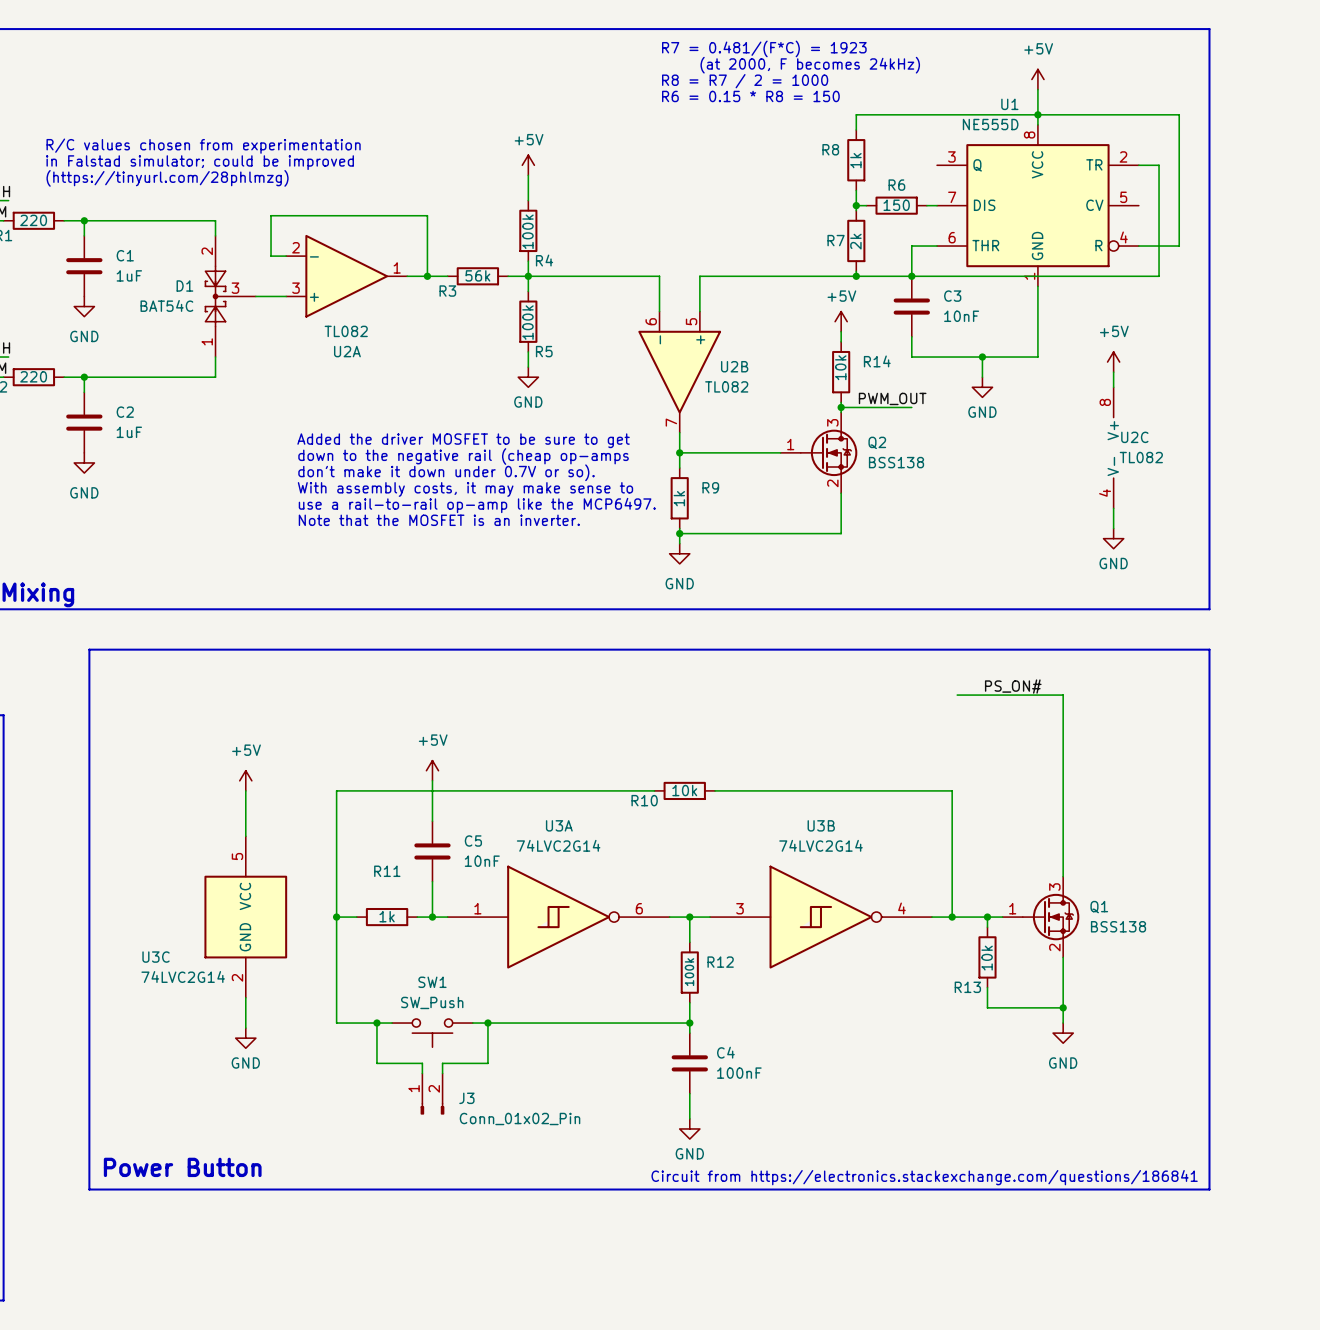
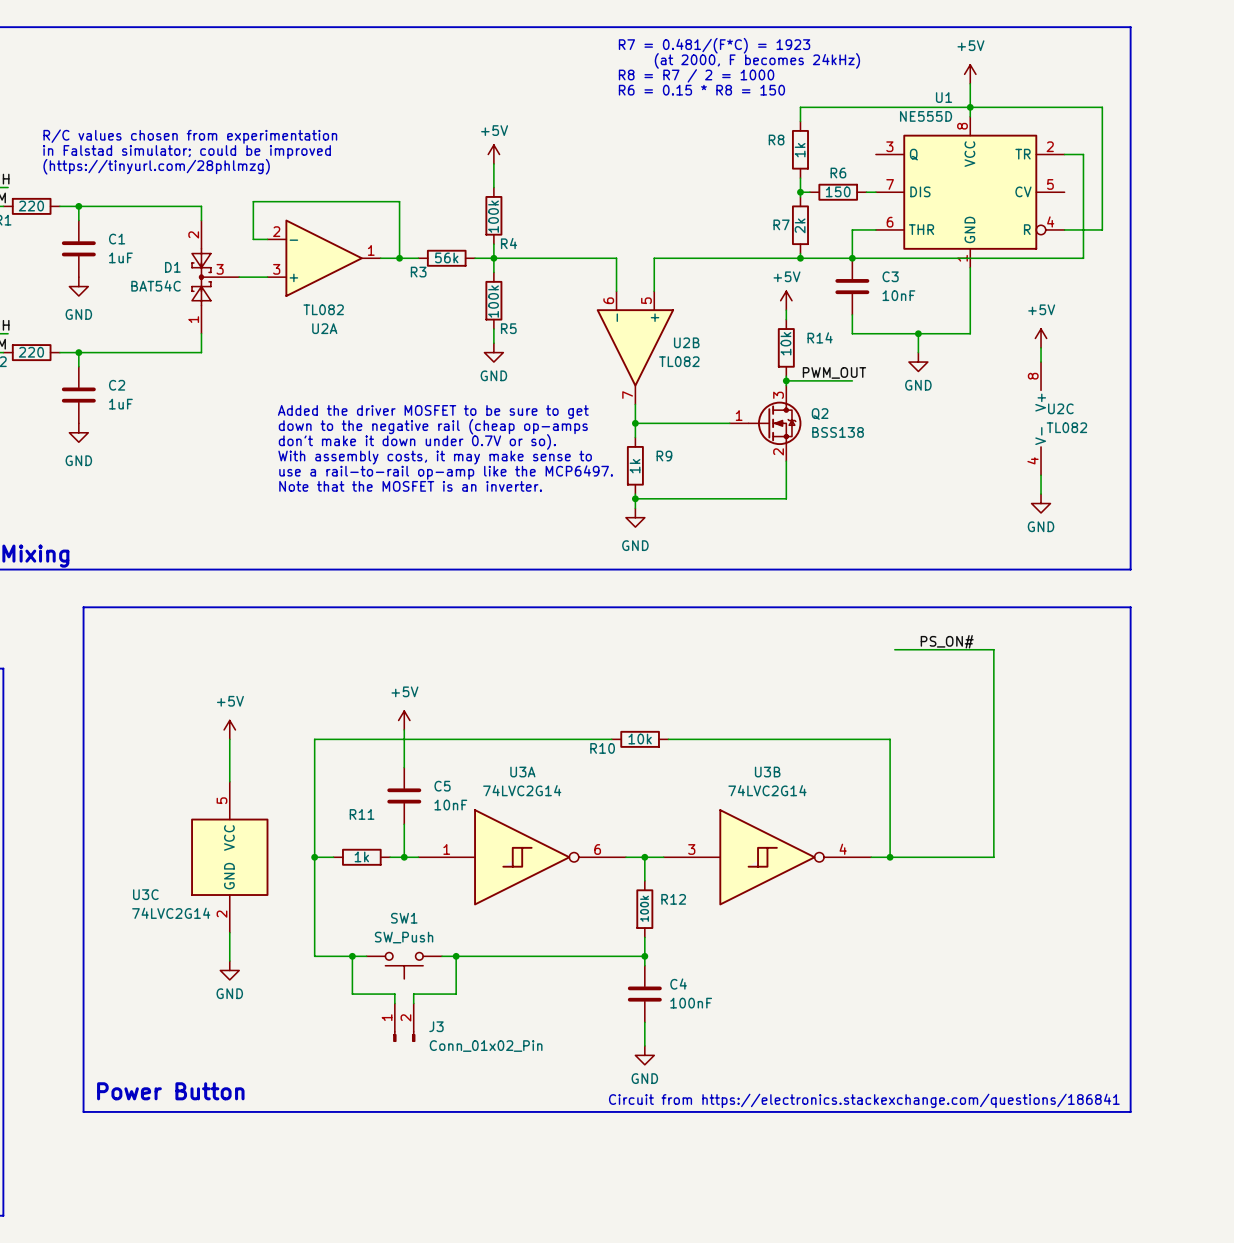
wire: (987, 917) (987, 927) -> none
junction: (987, 917) -> none
Q1: BSS138 (1040, 917) -> none
R13: 10k (987, 957) -> none
wire: (1063, 957) (1063, 1023) -> none
wire: (987, 987) (987, 1007) (1063, 1007) -> none
junction: (1063, 1007) -> none
power symbol: GND (1063, 1033) -> none

